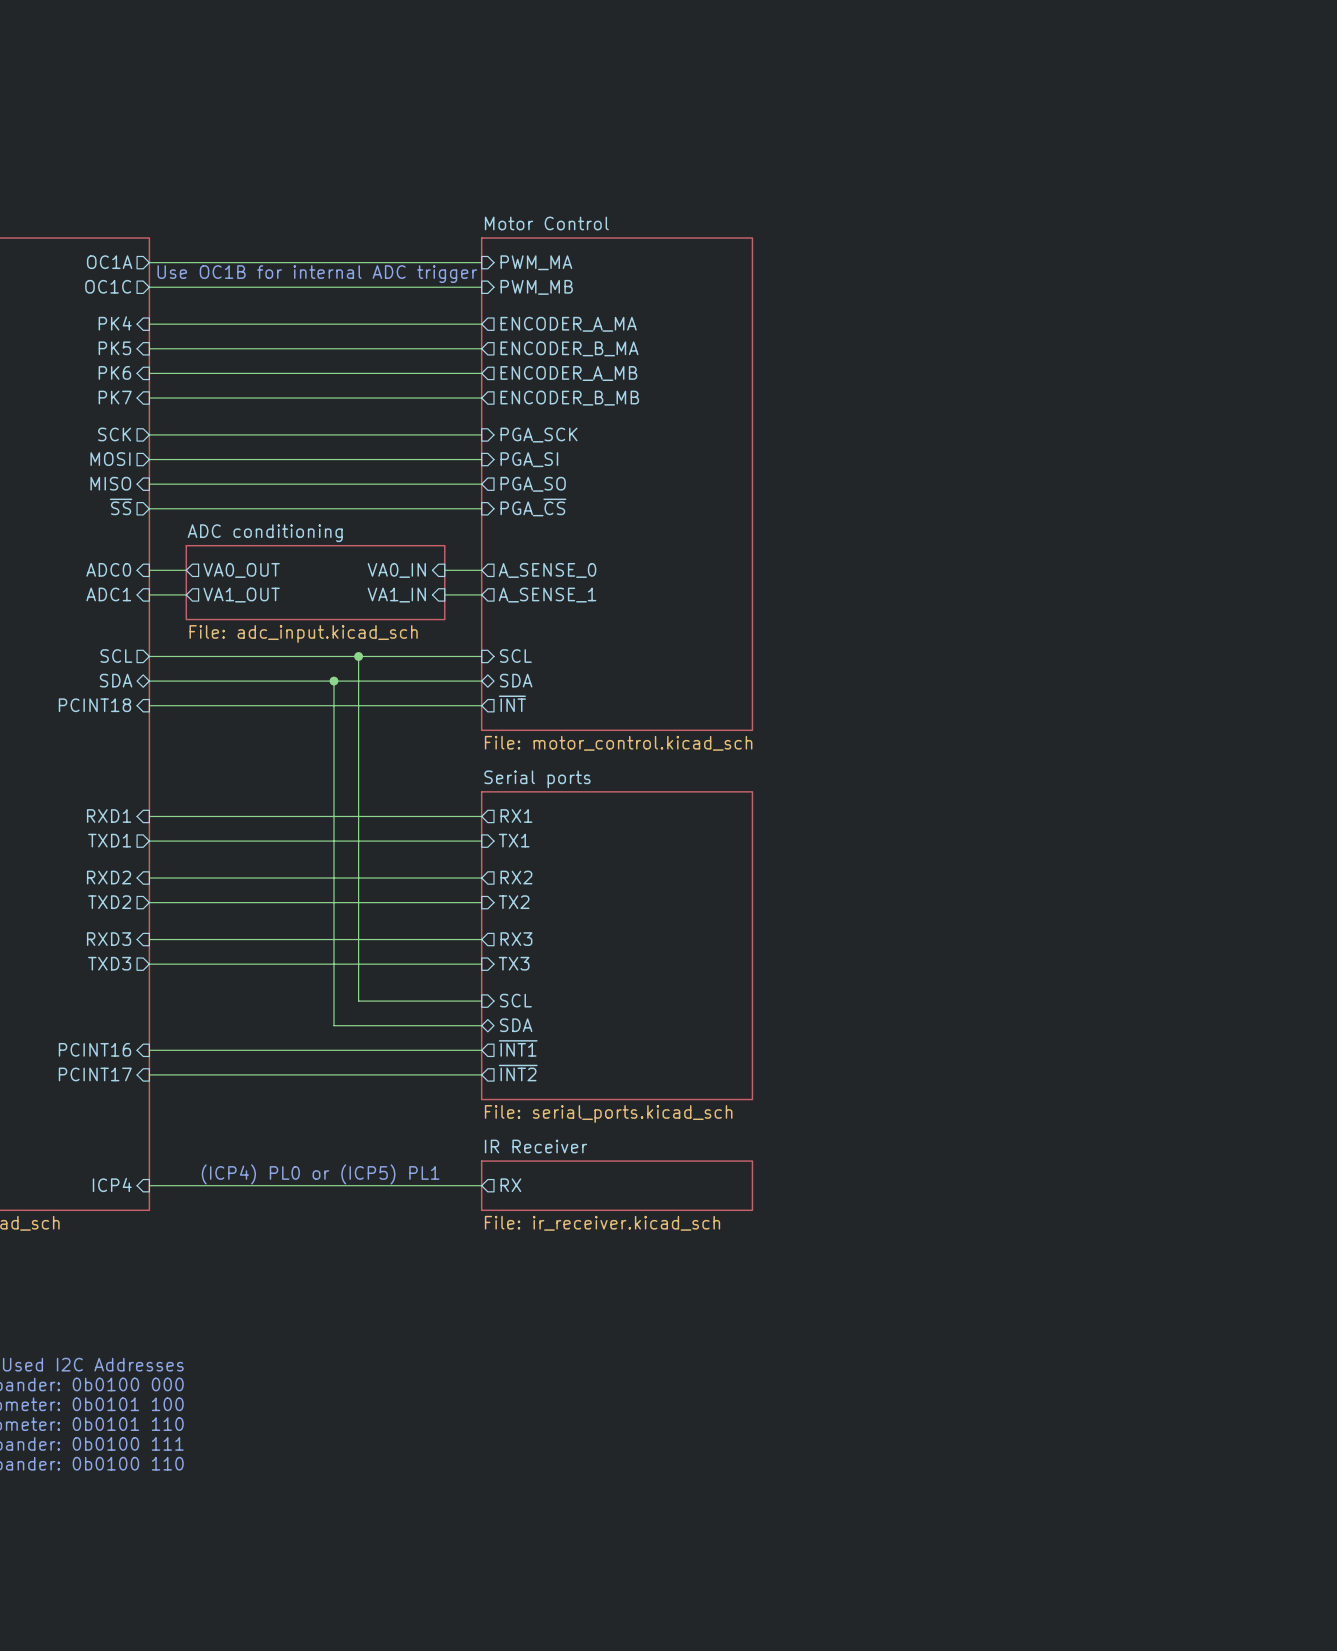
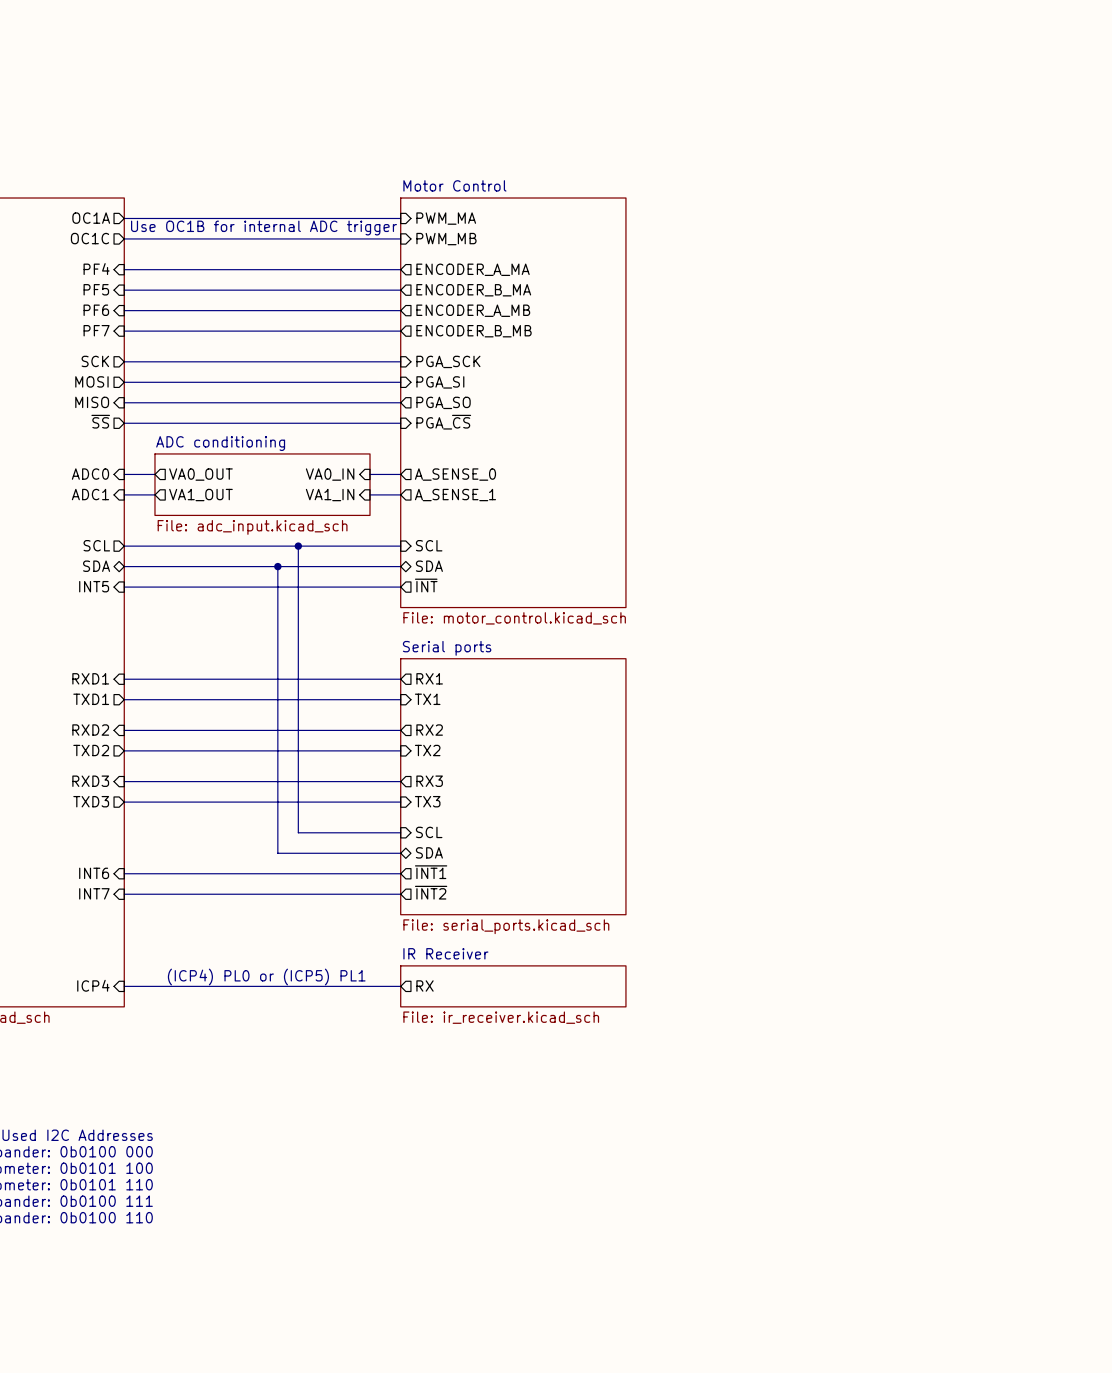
sheet pin: PK4 (115, 323) -> PF4 (96, 269)
sheet pin: PK5 (114, 348) -> PF5 (96, 289)
sheet pin: PK6 (114, 372) -> PF6 (96, 310)
sheet pin: PK7 (115, 397) -> PF7 (96, 330)
sheet pin: PCINT18 (94, 705) -> INT5 (94, 586)
sheet pin: PCINT16 (94, 1049) -> INT6 (94, 873)
sheet pin: PCINT17 (95, 1074) -> INT7 (94, 893)

